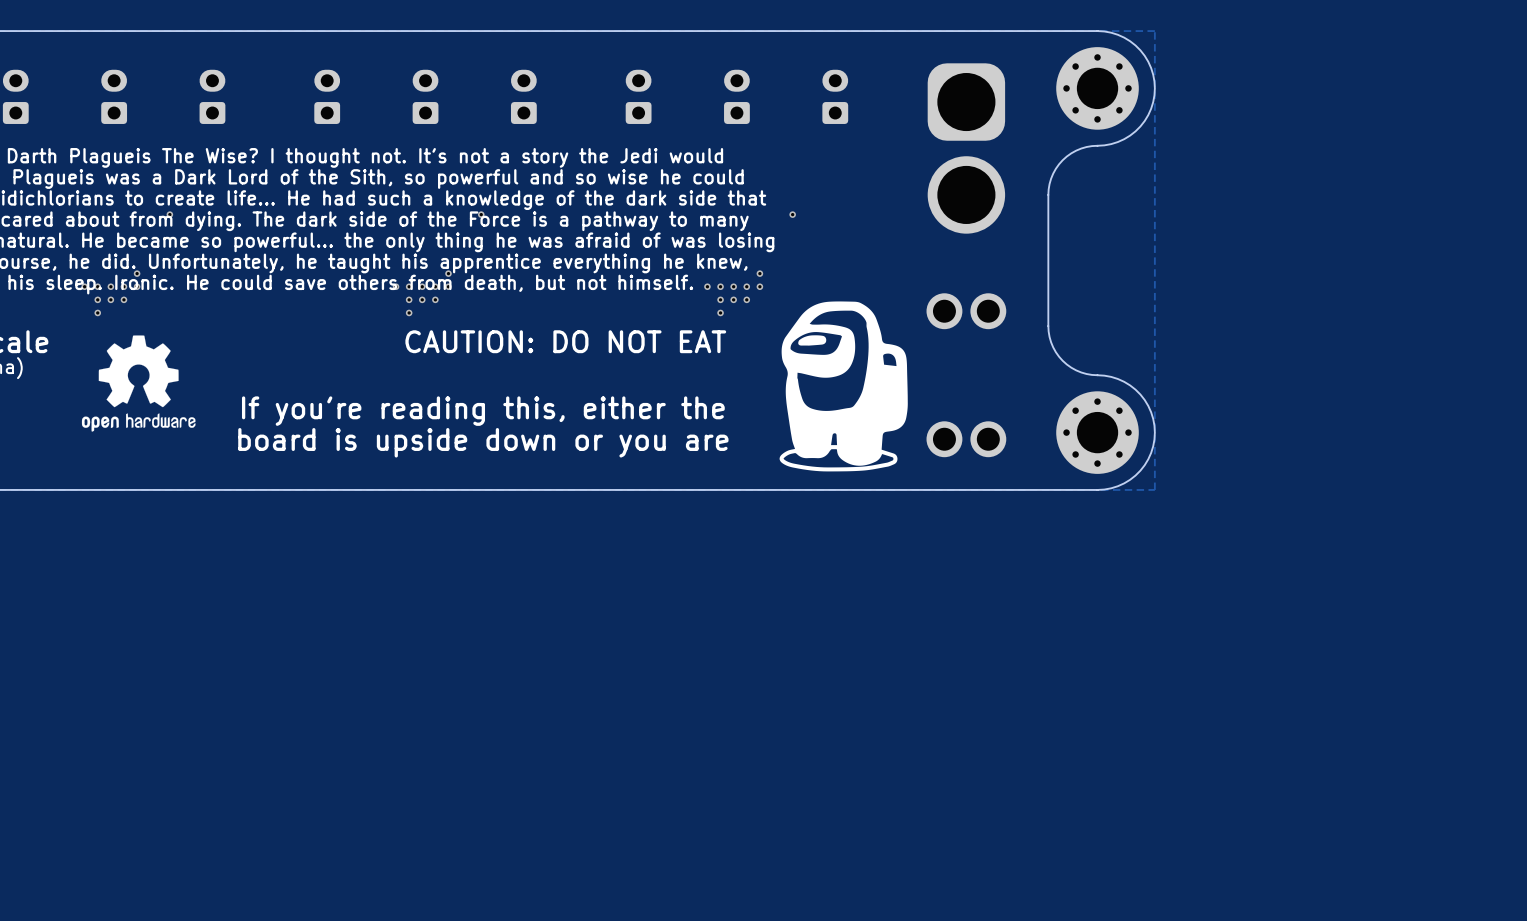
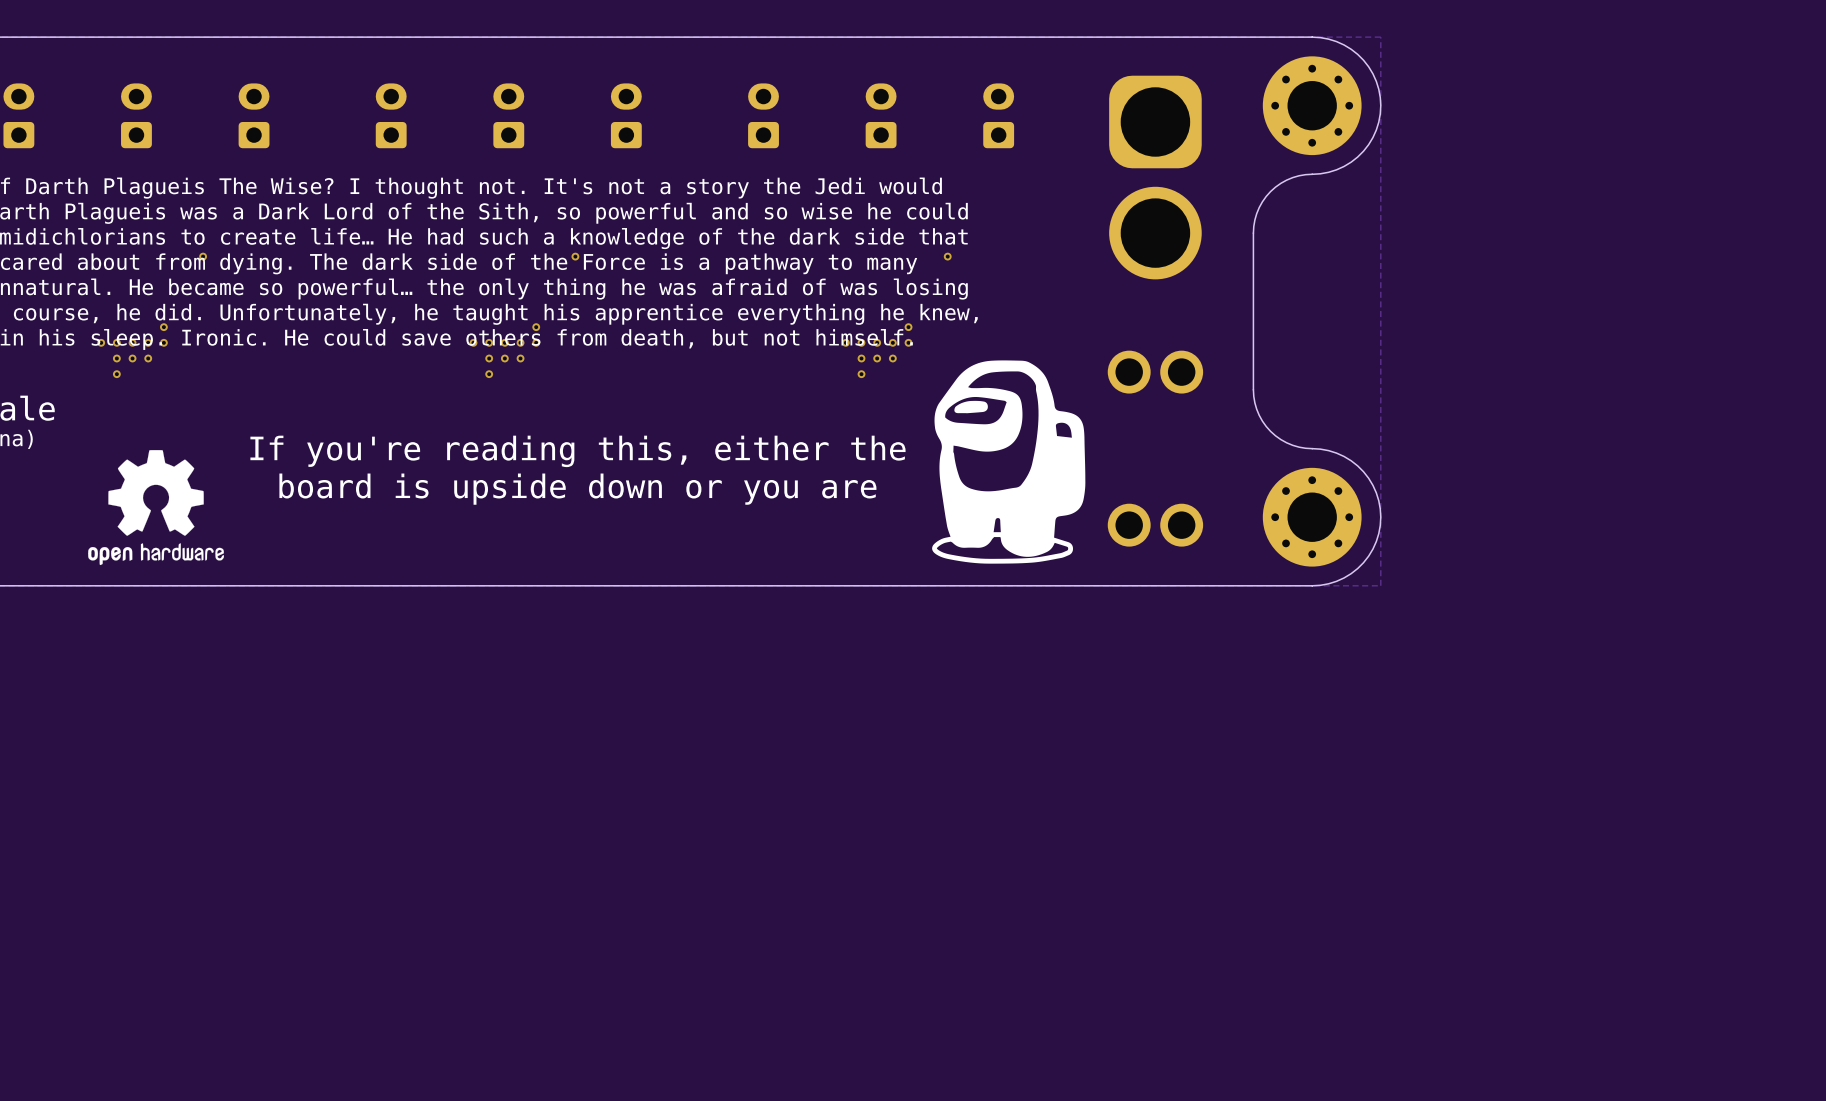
text: CAUTION: DO NOT EAT (565, 341) -> none
text: none -> If you're reading this, either the (577, 451)
drawing position: (138, 383) -> (156, 507)
text: If you're reading this, either the (483, 411) -> board is upside down or you are (577, 489)
text: board is upside down or you are (483, 442) -> none

